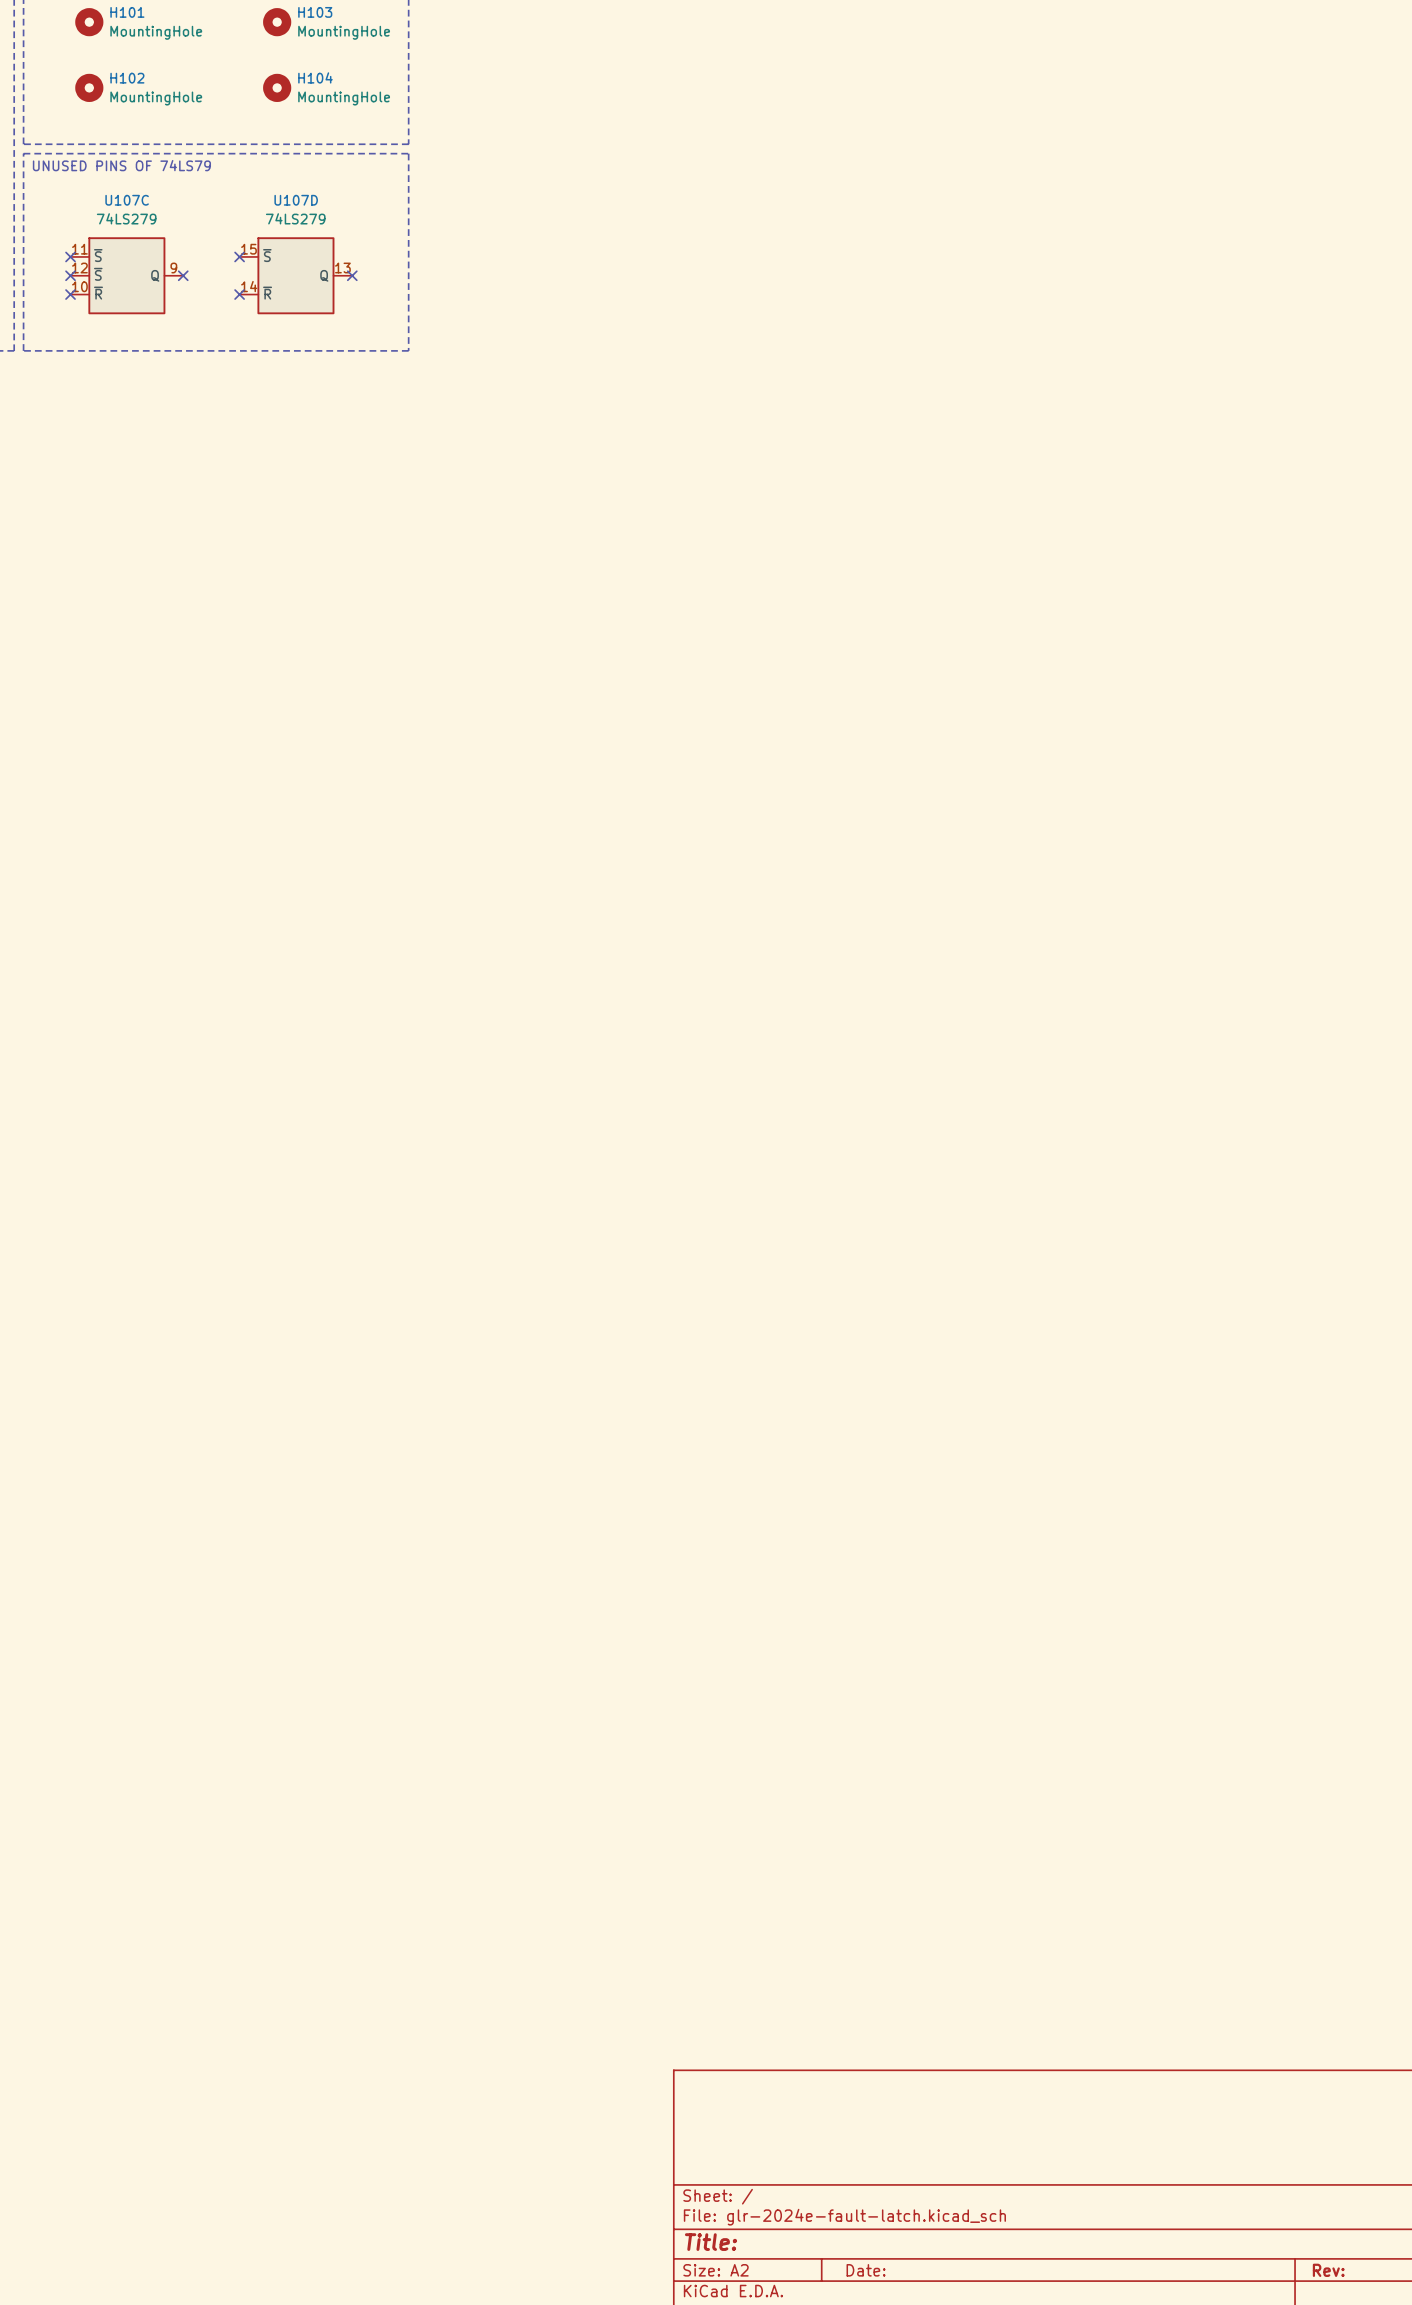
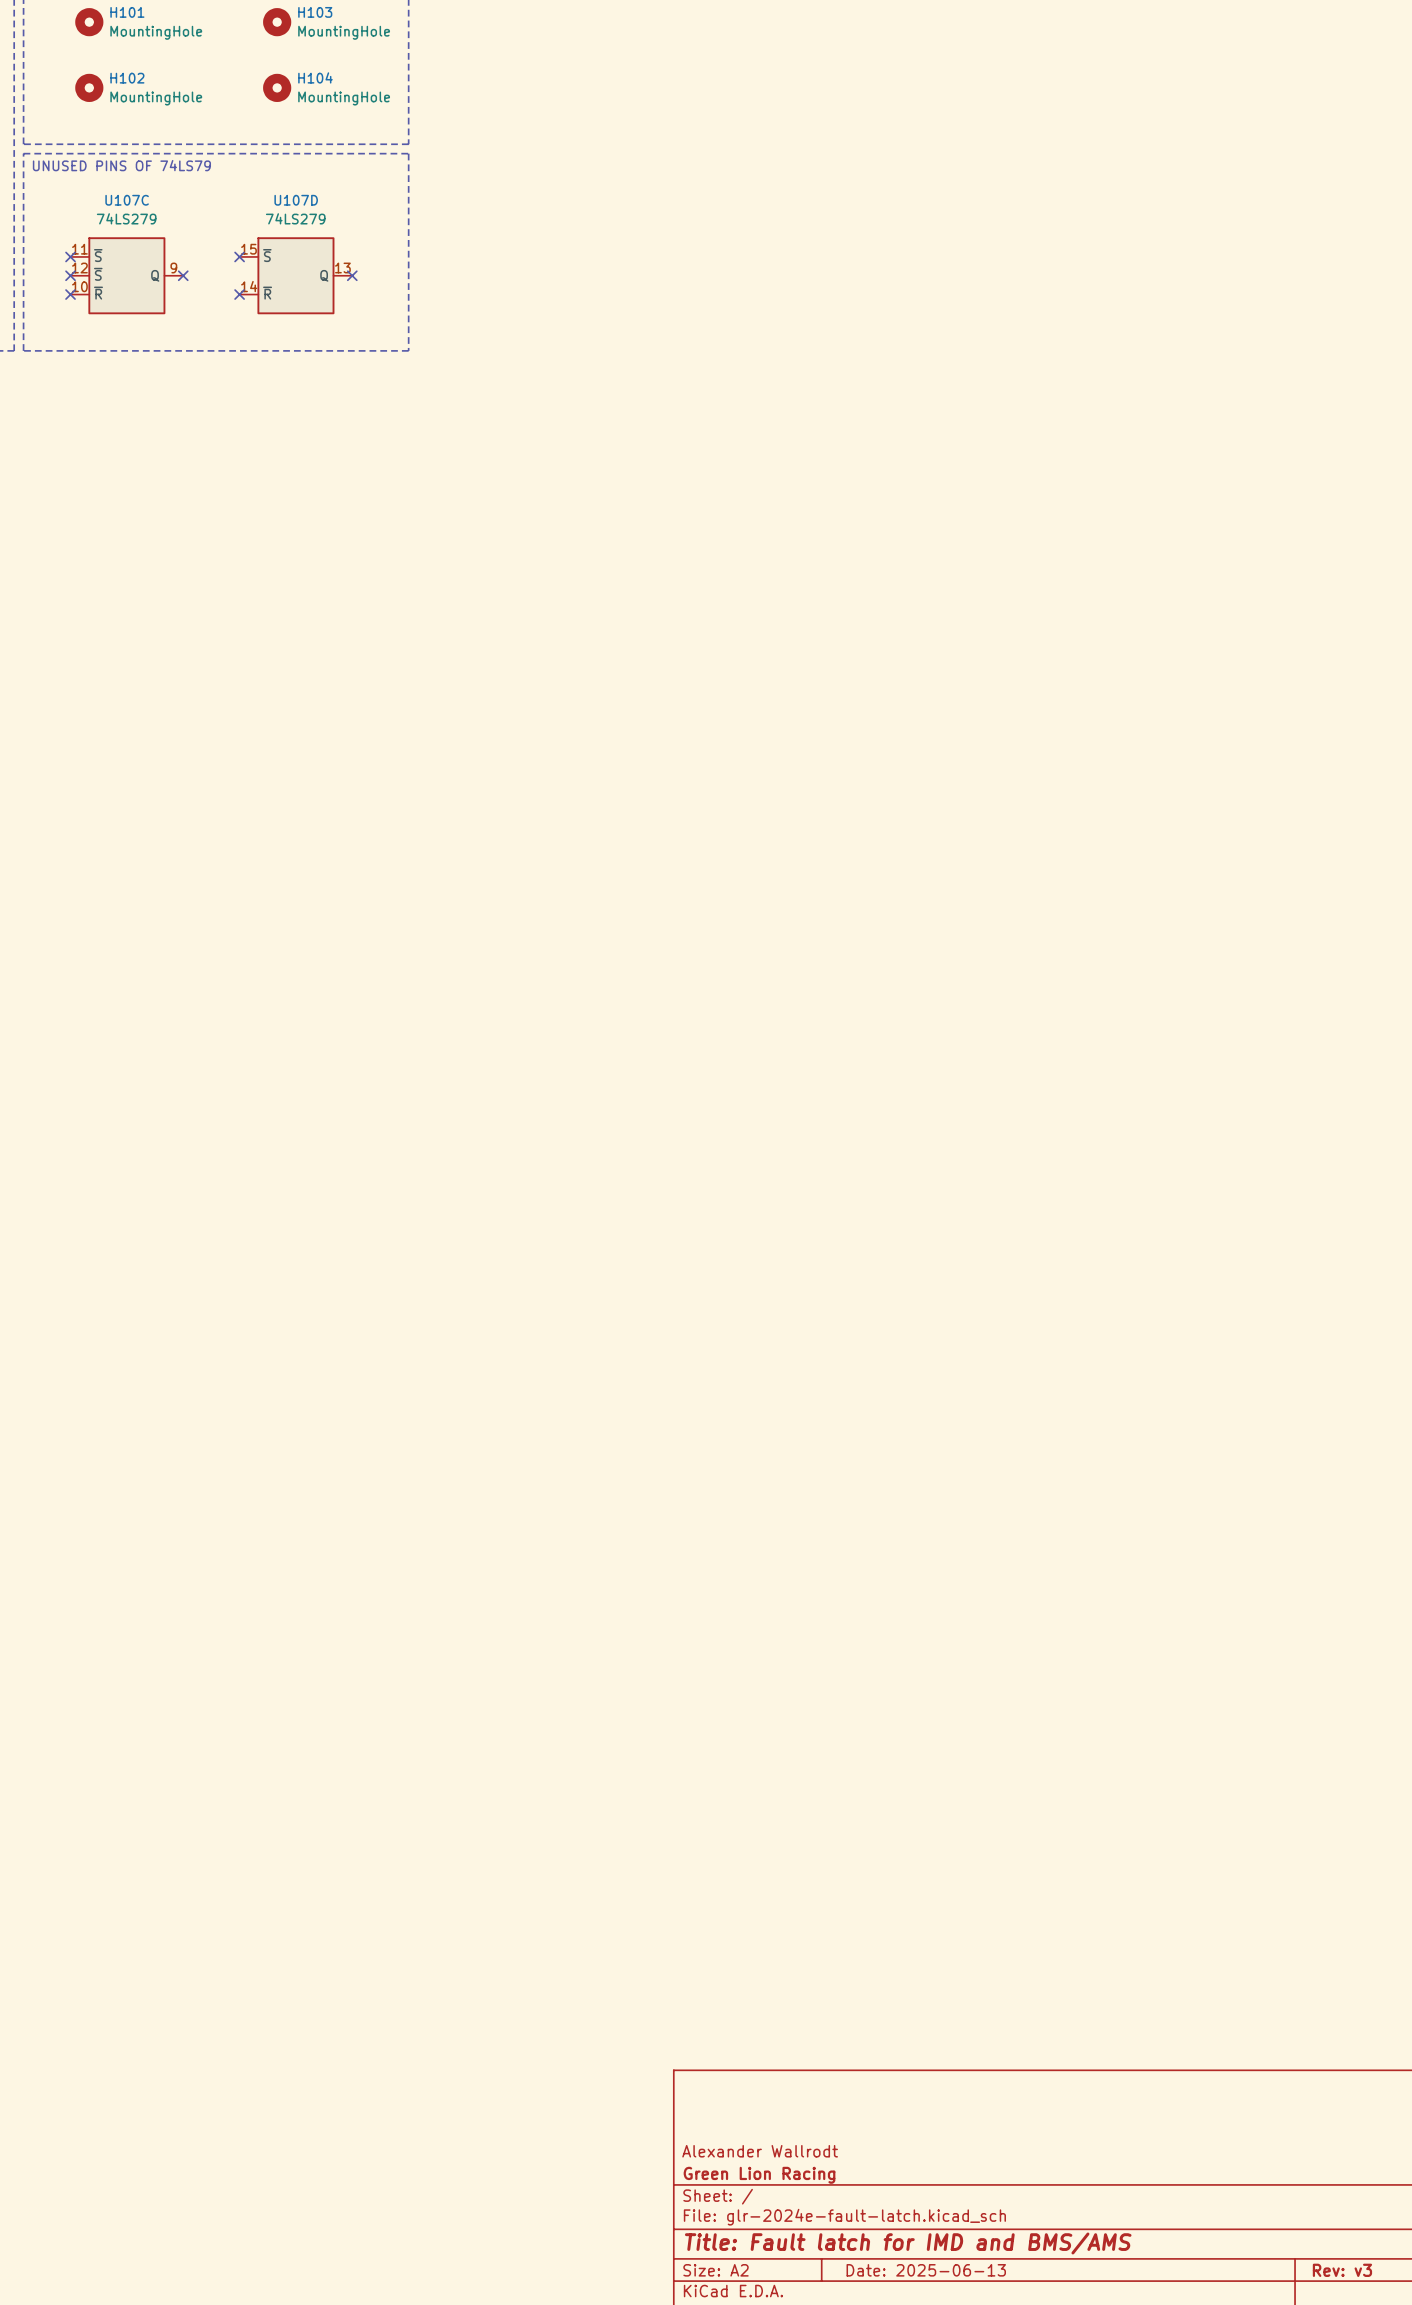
title block: none -> Alexander Wallrodt (760, 2151)
title block: none -> Green Lion Racing (759, 2175)
title block: Title: (711, 2242) -> Title: Fault latch for IMD and BMS/AMS (908, 2243)
title block: Date: (866, 2270) -> Date: 2025-06-13 (926, 2270)
title block: Rev: (1328, 2270) -> Rev: v3 (1342, 2270)

